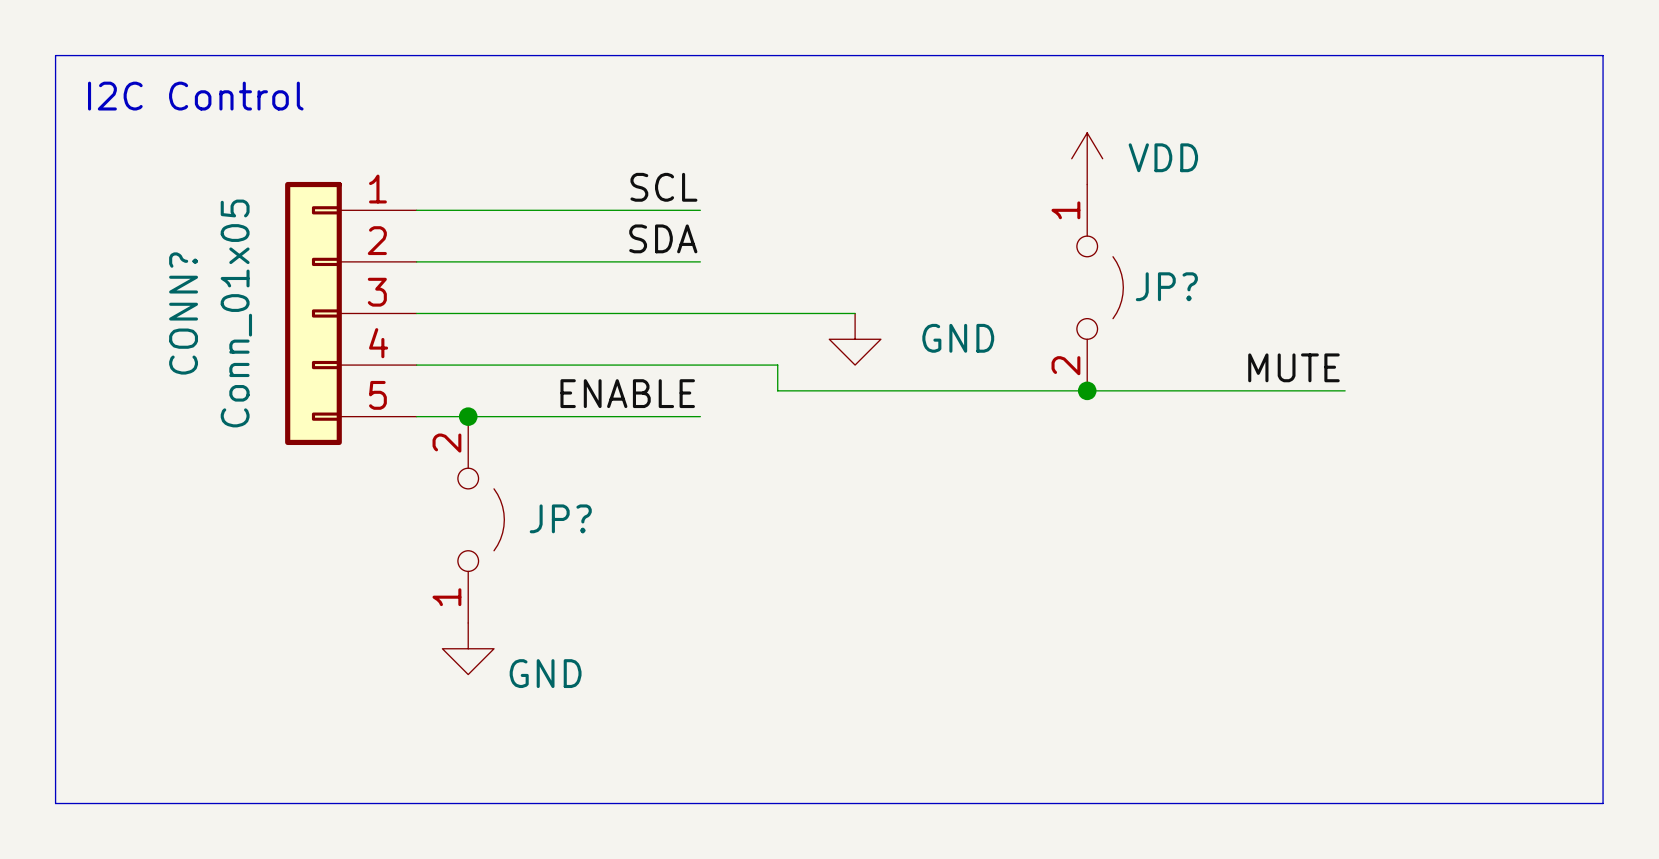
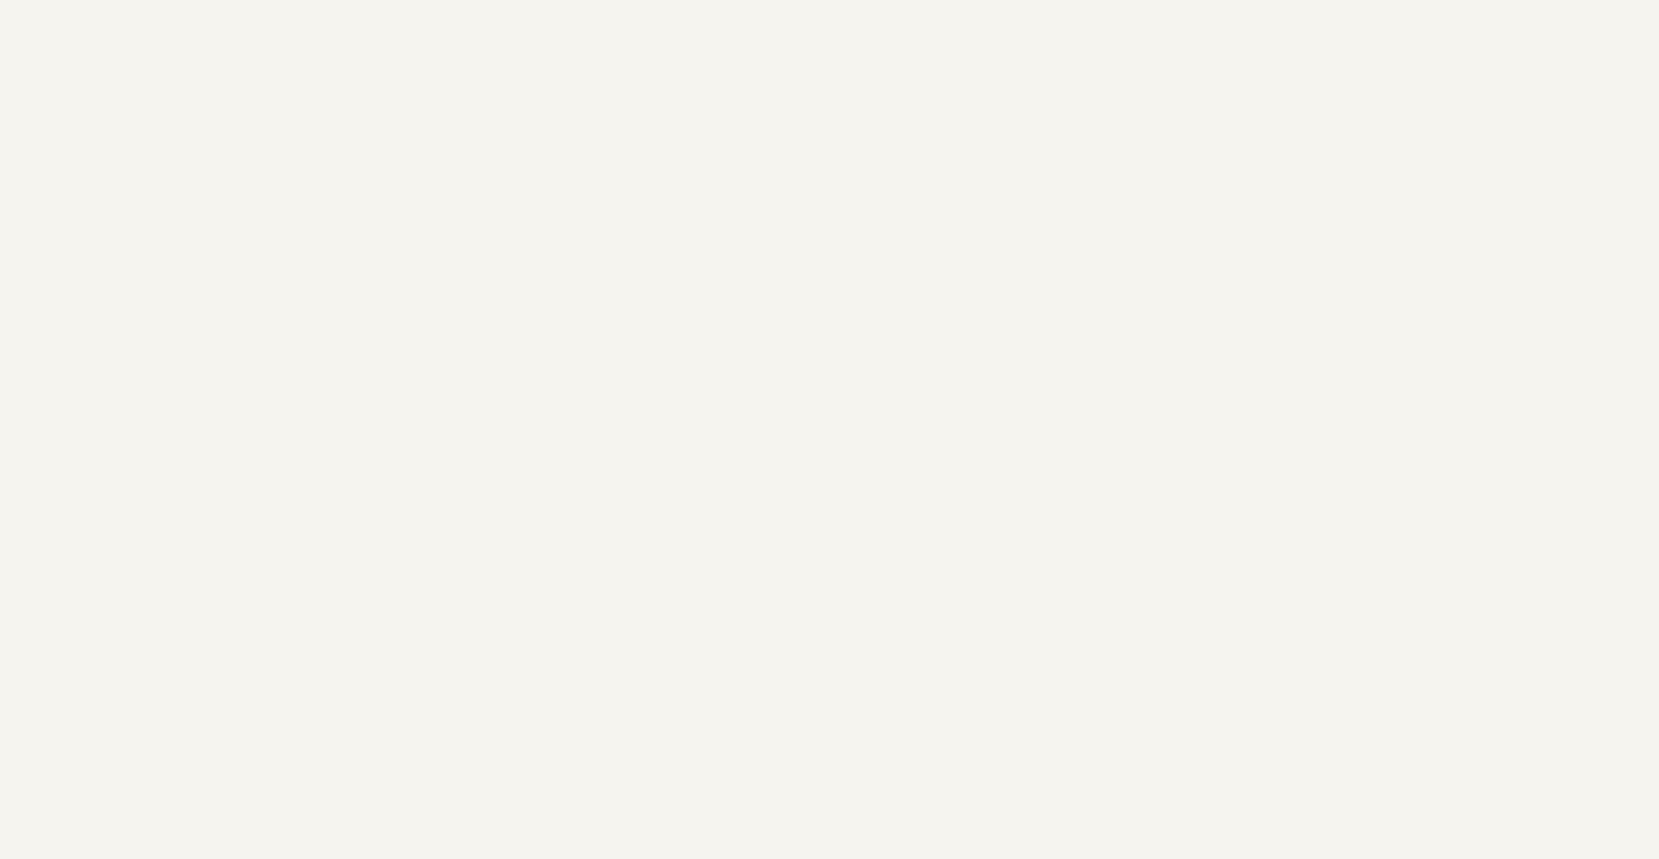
line: (55, 55) (55, 803) (1603, 803) (1603, 55) (55, 55) -> none
text: I2C Control (195, 96) -> none
power symbol: VDD (1087, 158) -> none
label: SCL (663, 187) -> none
wire: (416, 210) (700, 210) -> none
label: SDA (663, 238) -> none
wire: (416, 261) (700, 261) -> none
JP?: (1100, 287) -> none
CONN?: Conn_01x05 (350, 313) -> none
wire: (416, 313) (855, 313) -> none
power symbol: GND (855, 339) -> none
wire: (416, 365) (777, 365) (777, 390) (1345, 390) -> none
label: MUTE (1293, 367) -> none
junction: (1087, 390) -> none
label: ENABLE (627, 393) -> none
wire: (416, 416) (700, 416) -> none
junction: (468, 416) -> none
JP?: (481, 519) -> none
power symbol: GND (468, 648) -> none

